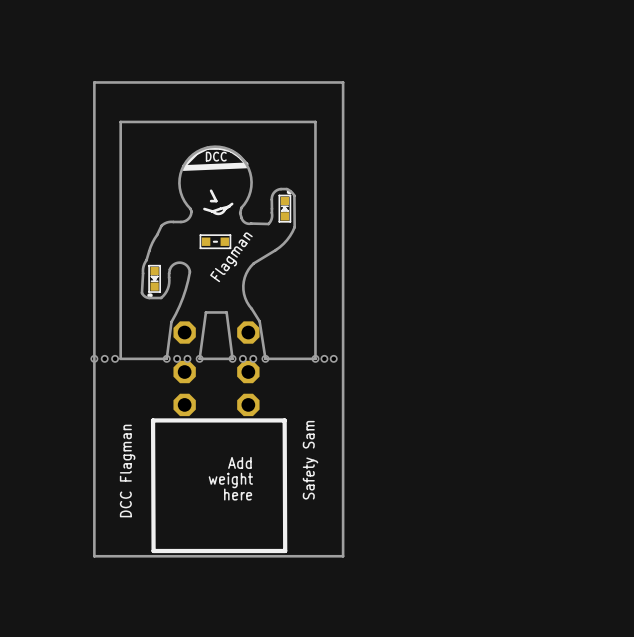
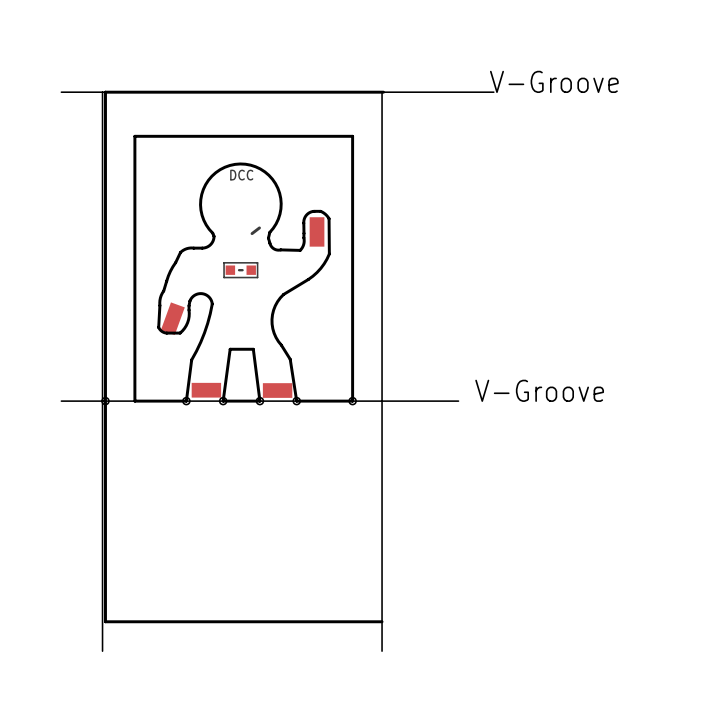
text: none -> V-Groove (554, 81)
board edge: none -> (61, 92) (105, 92)
board edge: none -> (102, 92) (102, 651)
board edge: none -> (382, 92) (382, 651)
board edge: (343, 82) (341, 556) -> (383, 92) (493, 92)
line: (207, 148) (230, 150) (246, 164) (183, 166) (196, 153) (207, 148) -> none
line: (246, 166) (183, 169) -> none
part footprint: [278, 189, 293, 223] -> [309, 217, 325, 247]
line: (211, 190) (216, 201) (211, 201) -> none
line: (229, 206) (212, 211) -> none
line: (225, 208) (219, 213) (213, 211) -> none
line: (204, 209) (213, 211) -> none
text: Flagman (231, 257) -> none
part footprint: [147, 265, 161, 298] -> [160, 302, 185, 336]
part: (184, 332) -> none
part: (248, 332) -> none
part: none -> (206, 390)
part: none -> (277, 390)
text: none -> V-Groove (539, 390)
board edge: none -> (61, 401) (134, 401)
hole: (104, 358) -> none
hole: (115, 358) -> none
board edge: none -> (186, 401) (223, 401)
hole: (177, 358) -> none
hole: (187, 358) -> none
board edge: none -> (259, 401) (296, 401)
hole: (242, 358) -> none
hole: (253, 358) -> none
board edge: none -> (352, 401) (458, 401)
hole: (324, 358) -> none
hole: (333, 358) -> none
part: (184, 372) -> none
part: (248, 372) -> none
part: (184, 404) -> none
part: (248, 404) -> none
line: (153, 420) (284, 420) (285, 551) (153, 551) (153, 420) -> none
text: Safety Sam (310, 460) -> none
text: Add (239, 462) -> none
text: DCC Flagman (127, 471) -> none
text: weight (230, 480) -> none
text: here (238, 494) -> none

